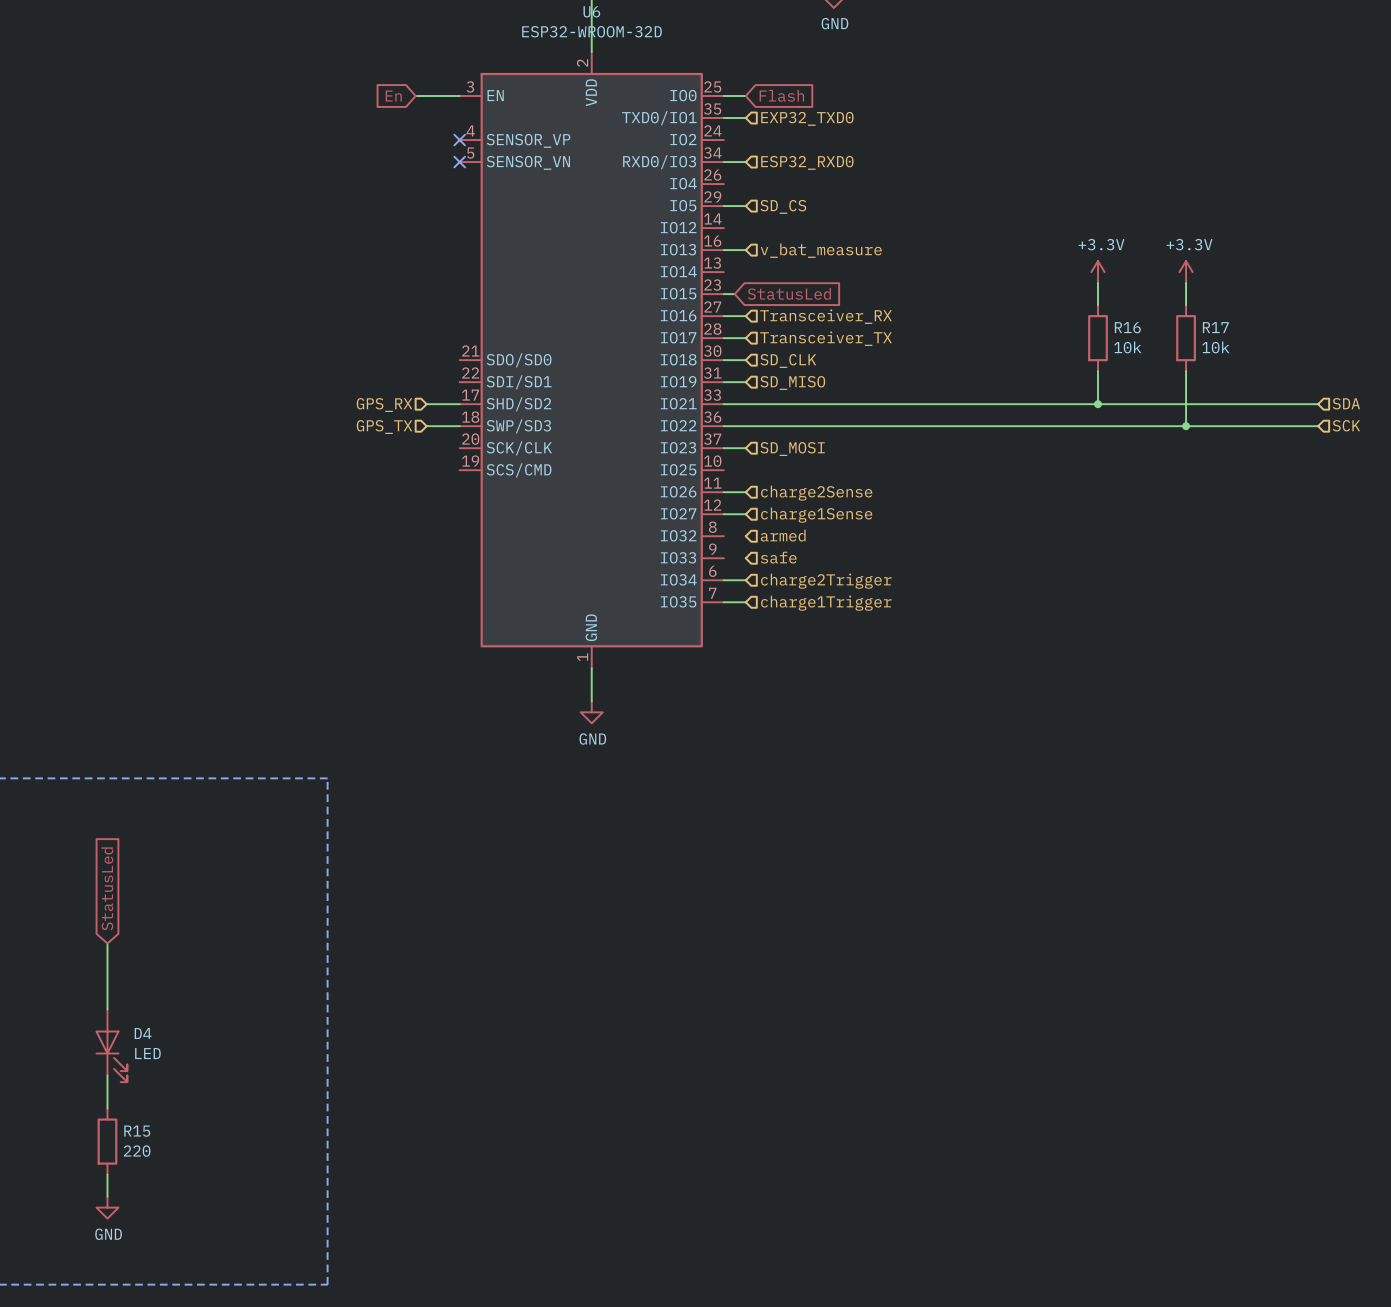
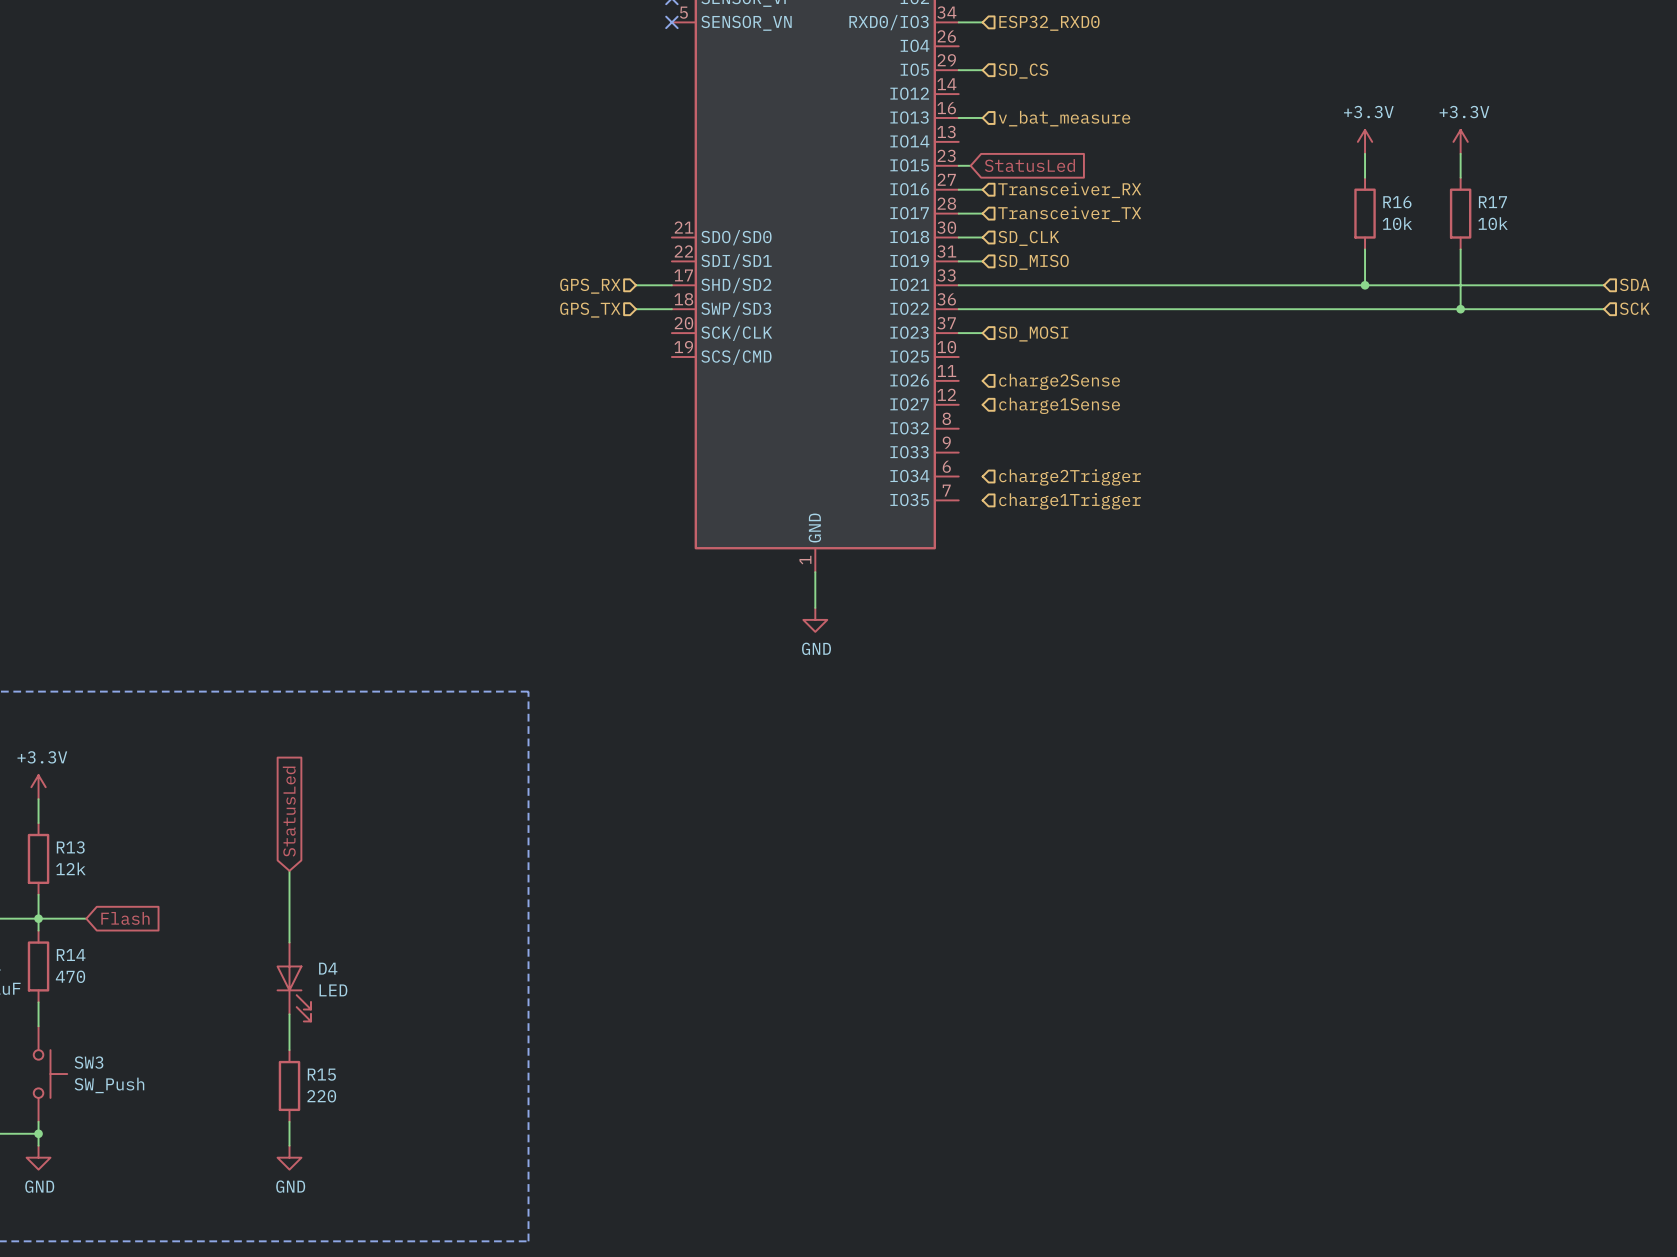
wire: (723, 492) (745, 492) -> none
wire: (723, 514) (745, 514) -> none
hierarchical label: armed (783, 535) -> none
hierarchical label: safe (778, 557) -> none
wire: (723, 580) (745, 580) -> none
wire: (723, 602) (745, 602) -> none

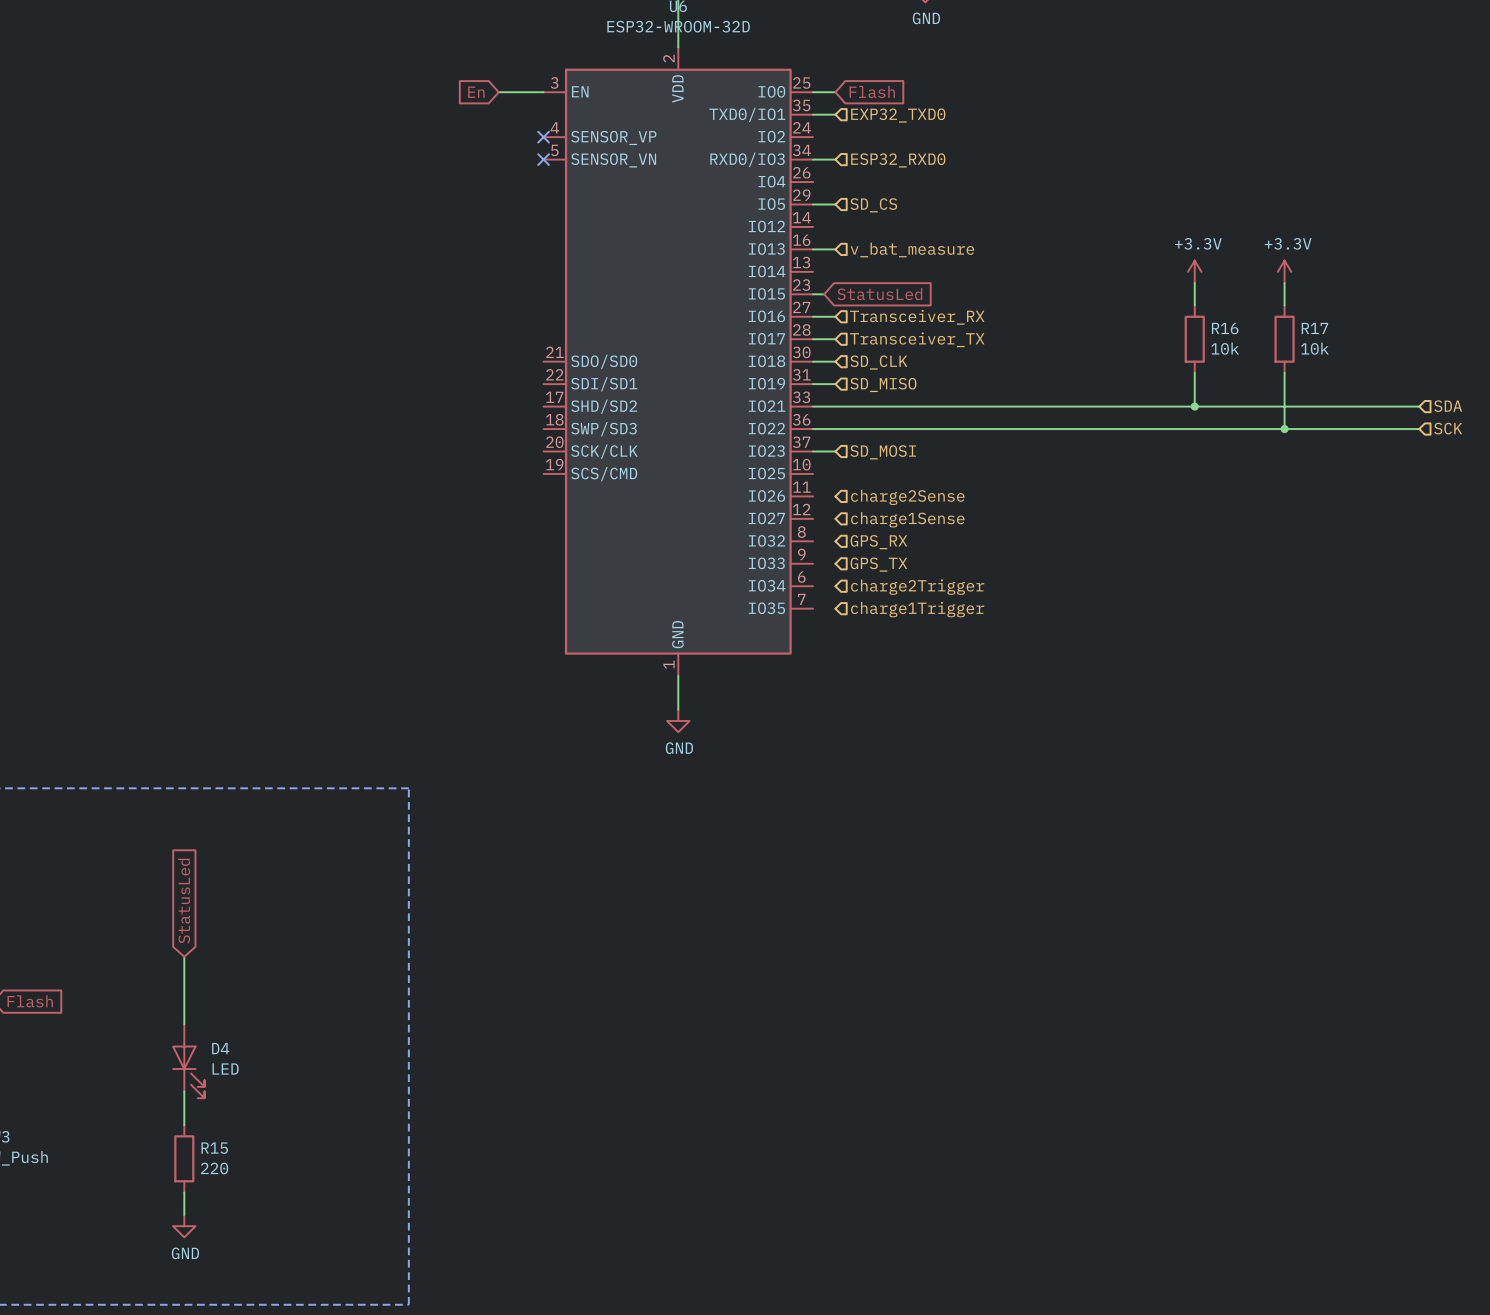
wire: (636, 285) (671, 285) -> none
hierarchical label: GPS_RX (590, 286) -> none
wire: (636, 309) (671, 309) -> none
hierarchical label: GPS_TX (590, 310) -> none
hierarchical label: none -> GPS_RX (878, 542)
hierarchical label: none -> GPS_TX (878, 564)

